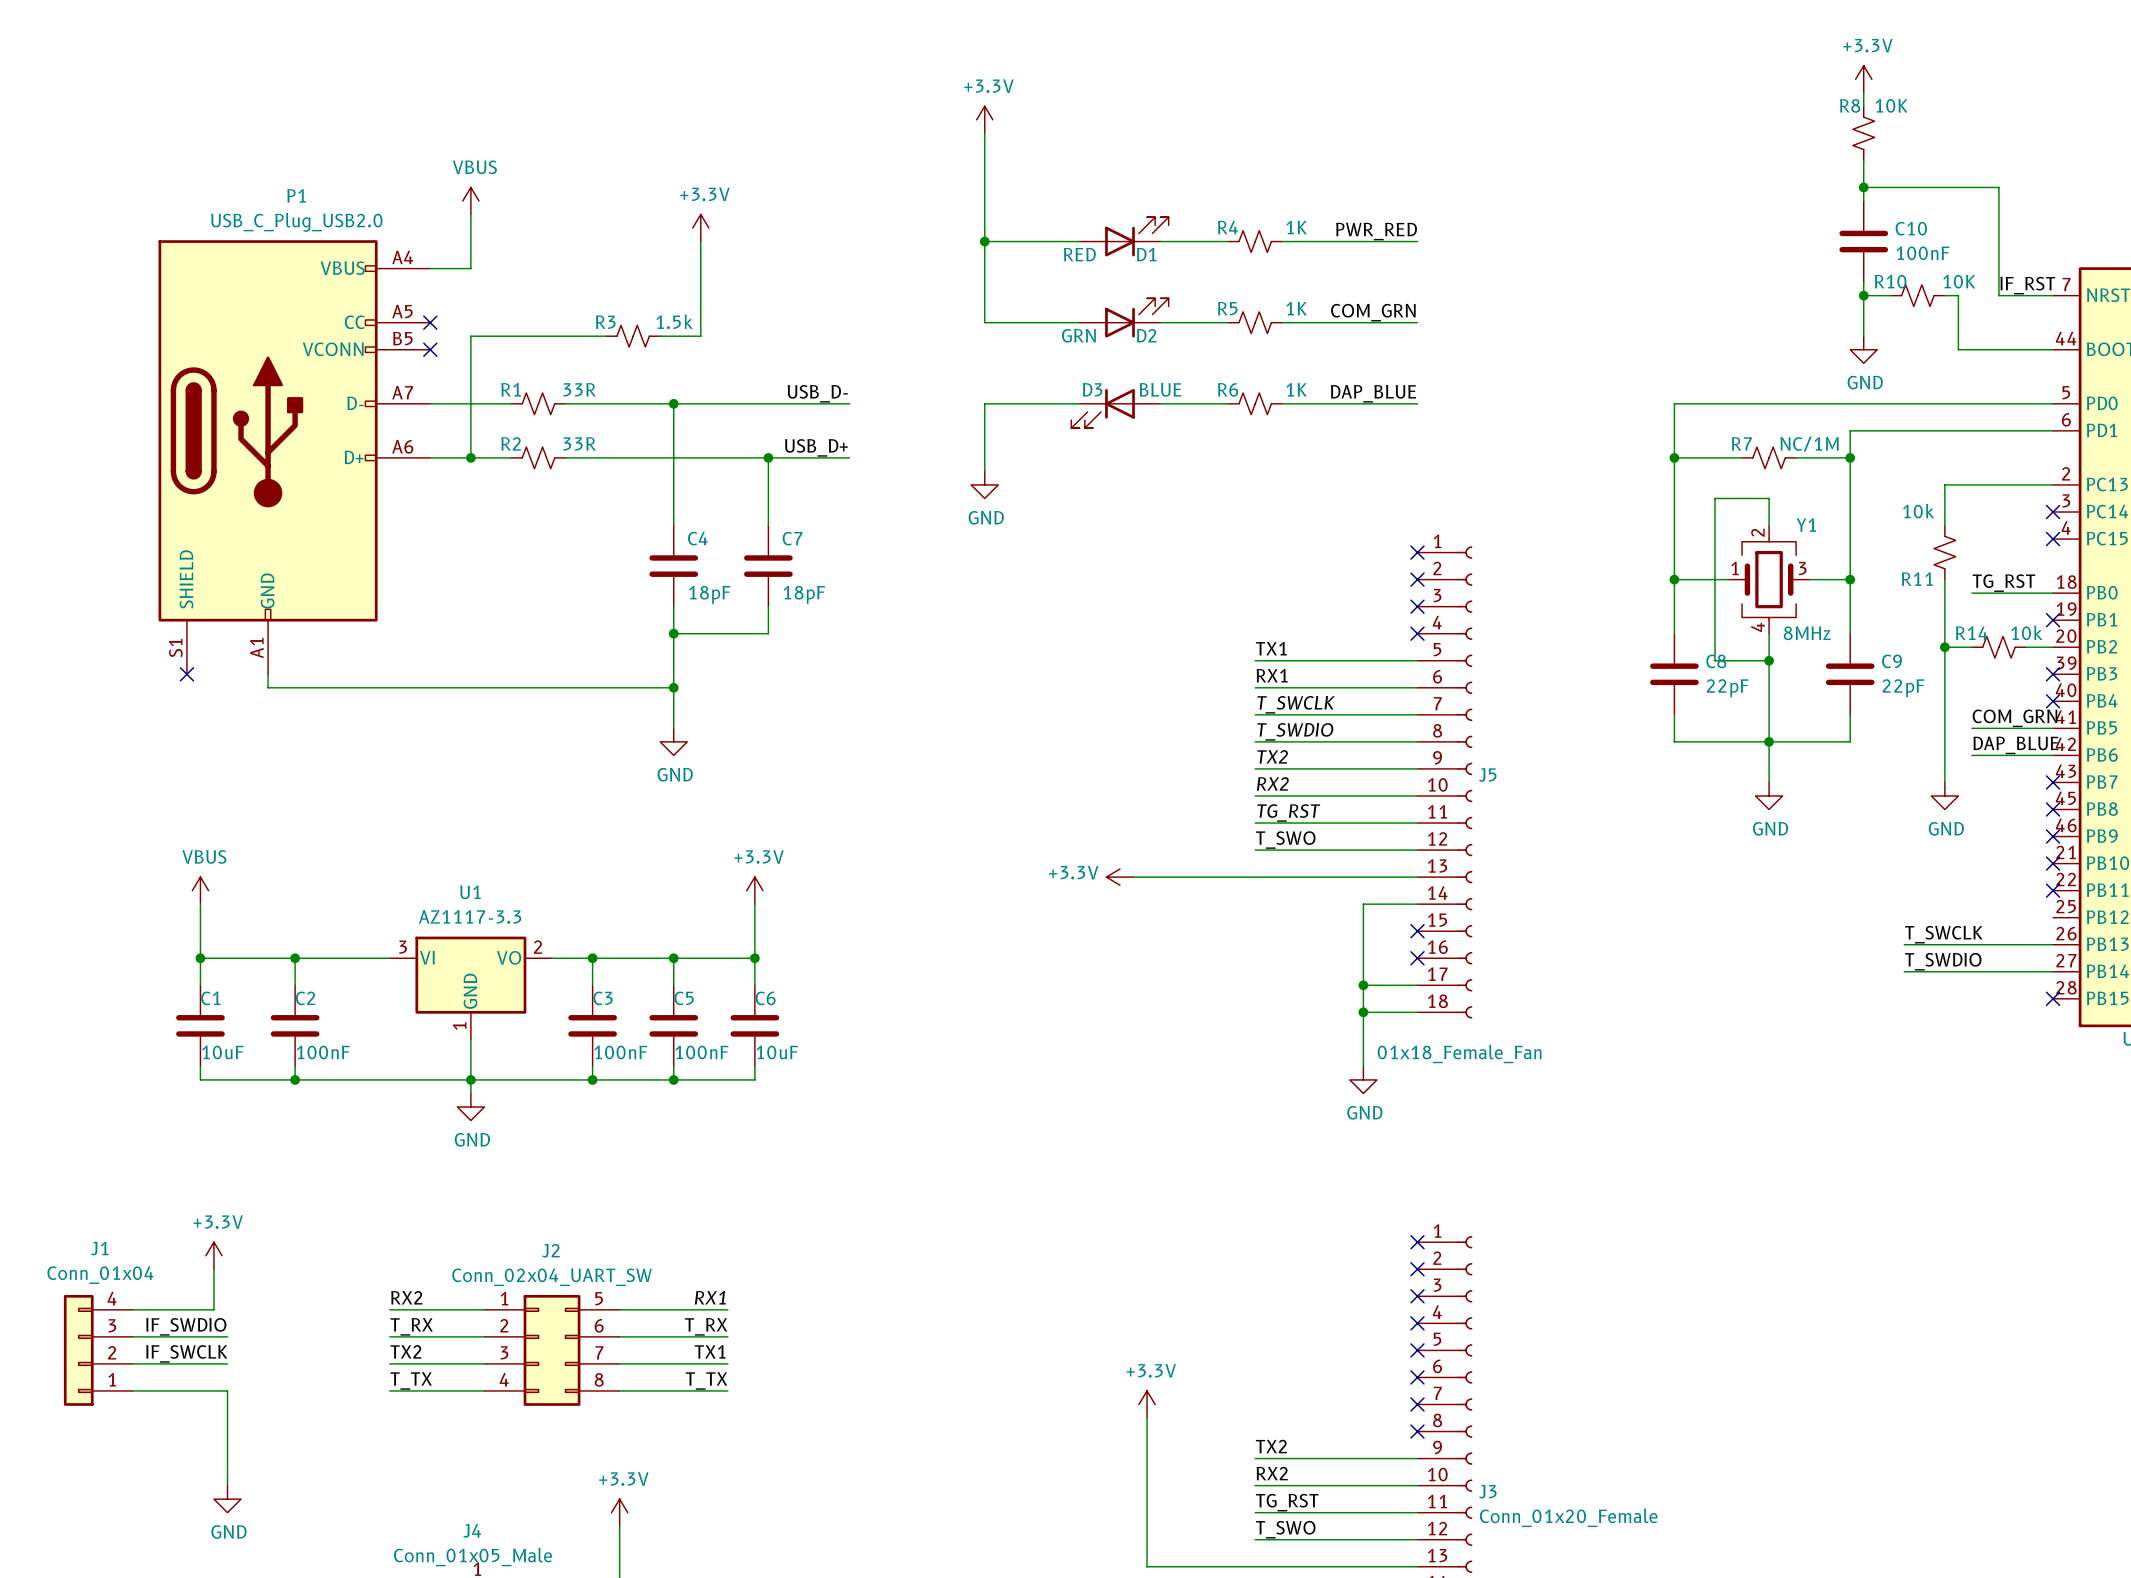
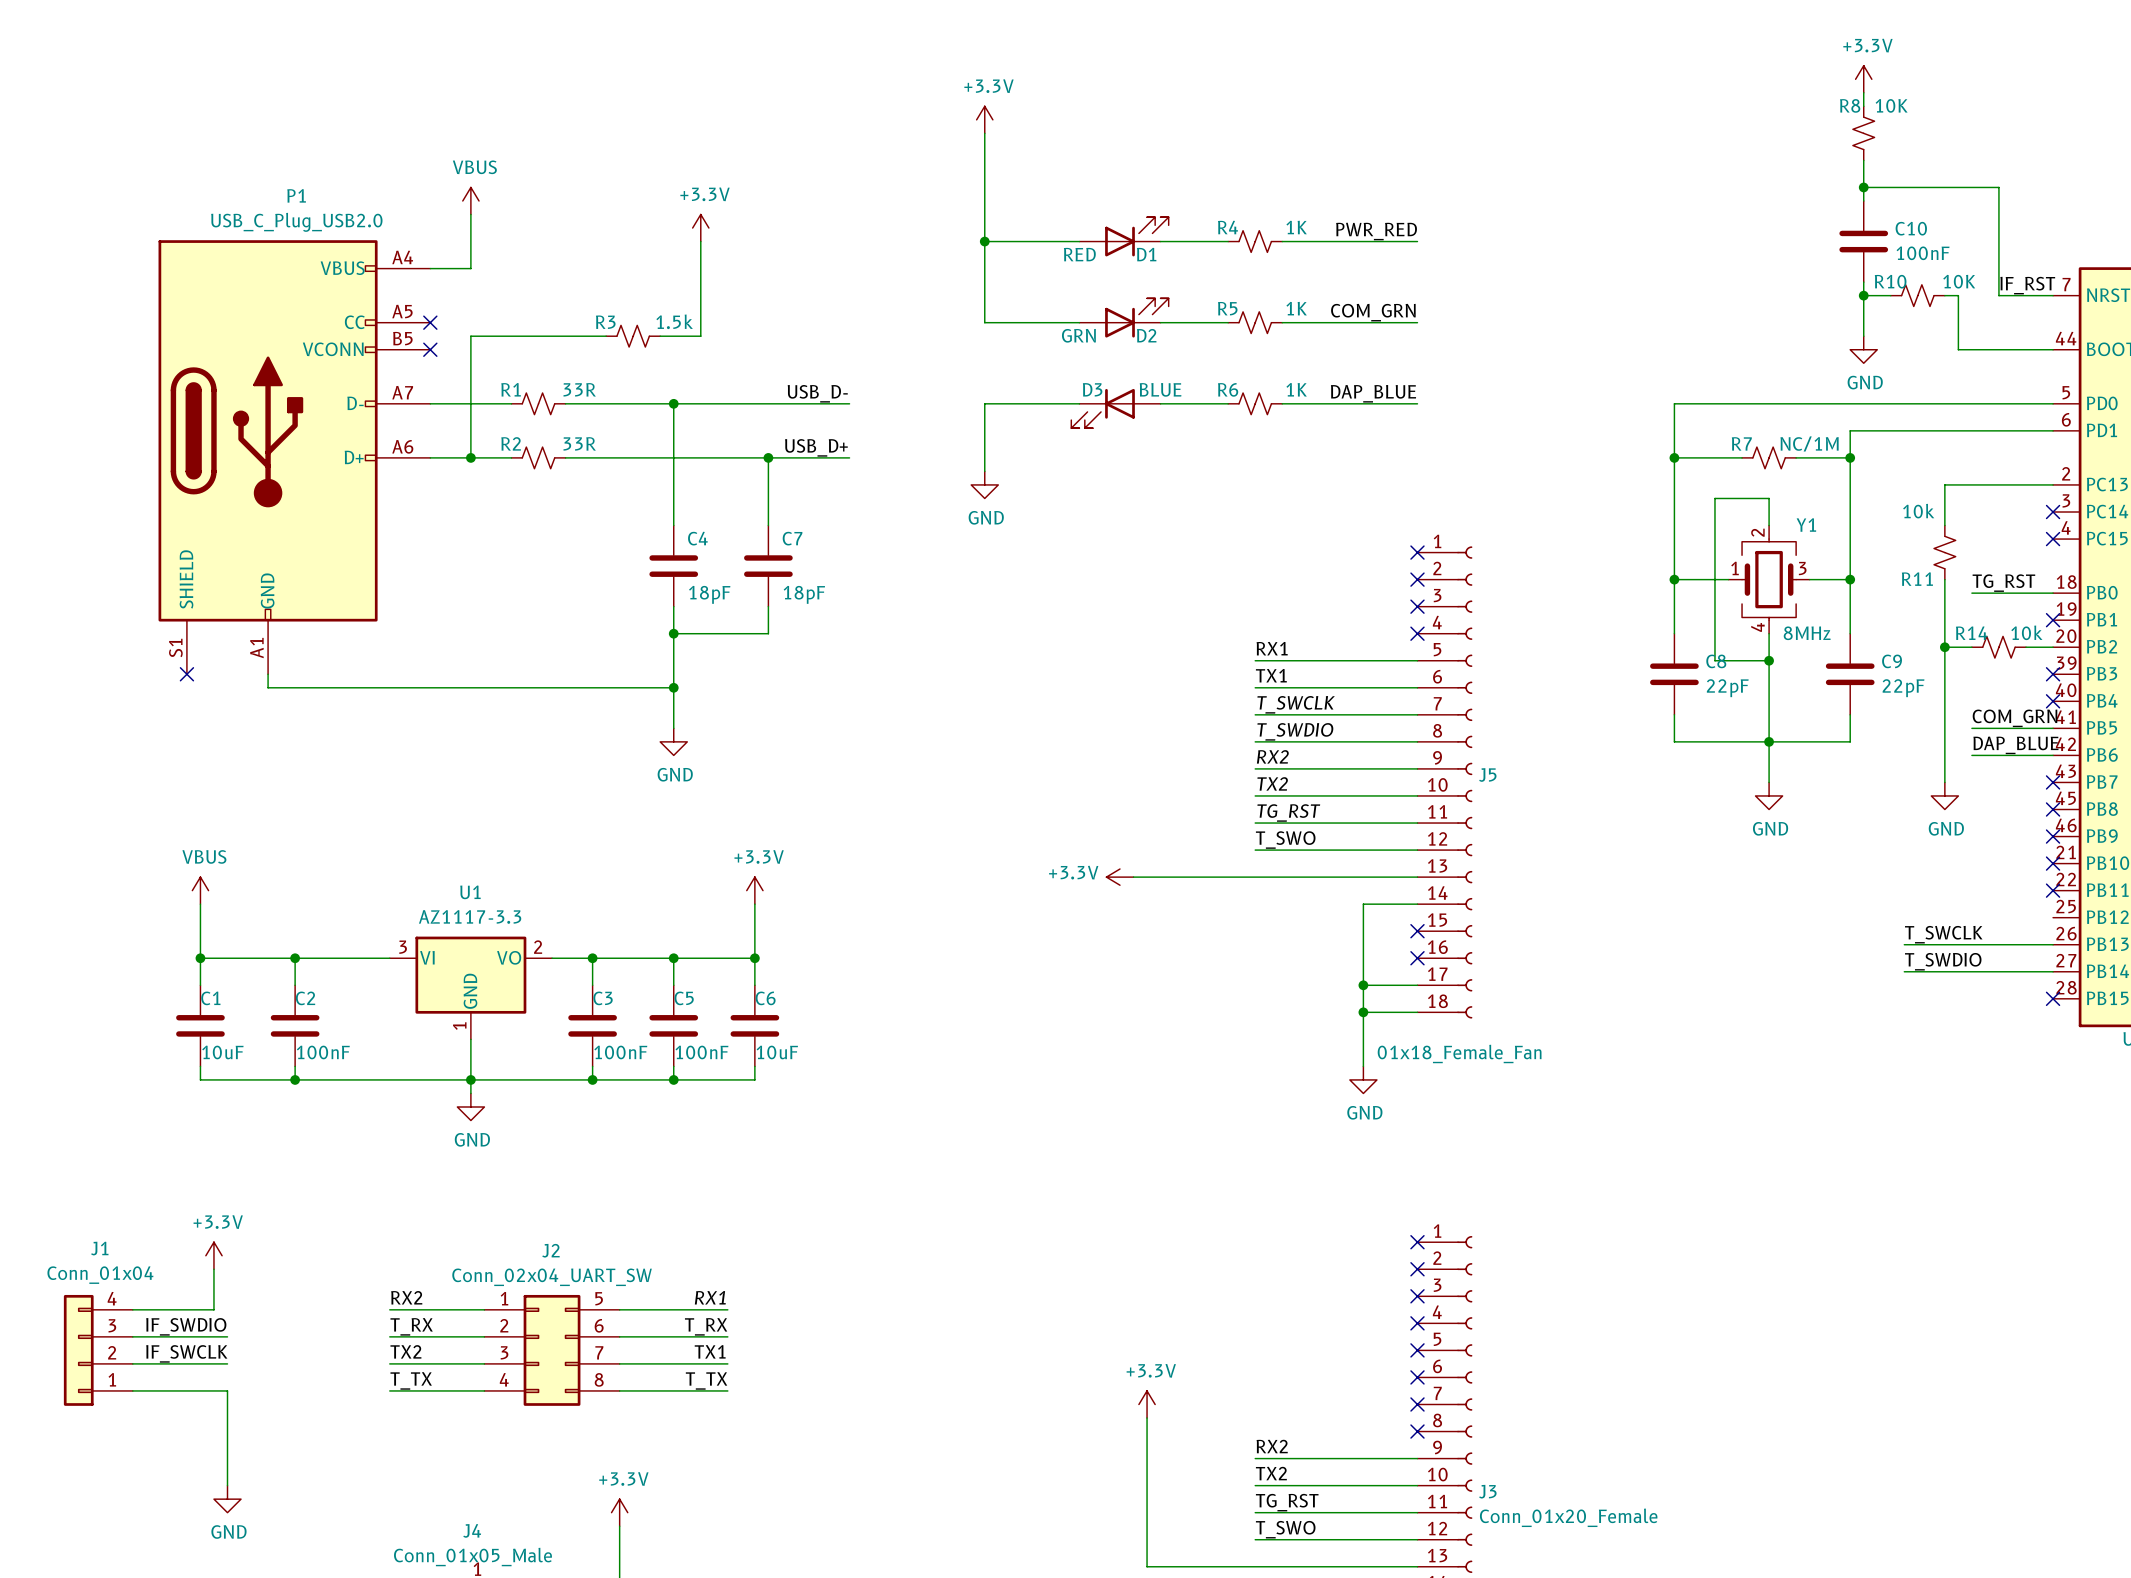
label: TX1 (1271, 648) -> RX1 (1272, 648)
label: RX1 (1272, 675) -> TX1 (1271, 675)
label: TX2 (1272, 756) -> RX2 (1272, 756)
label: RX2 (1272, 783) -> TX2 (1272, 783)
label: TX2 (1271, 1446) -> RX2 (1272, 1446)
label: RX2 (1272, 1473) -> TX2 (1271, 1473)

